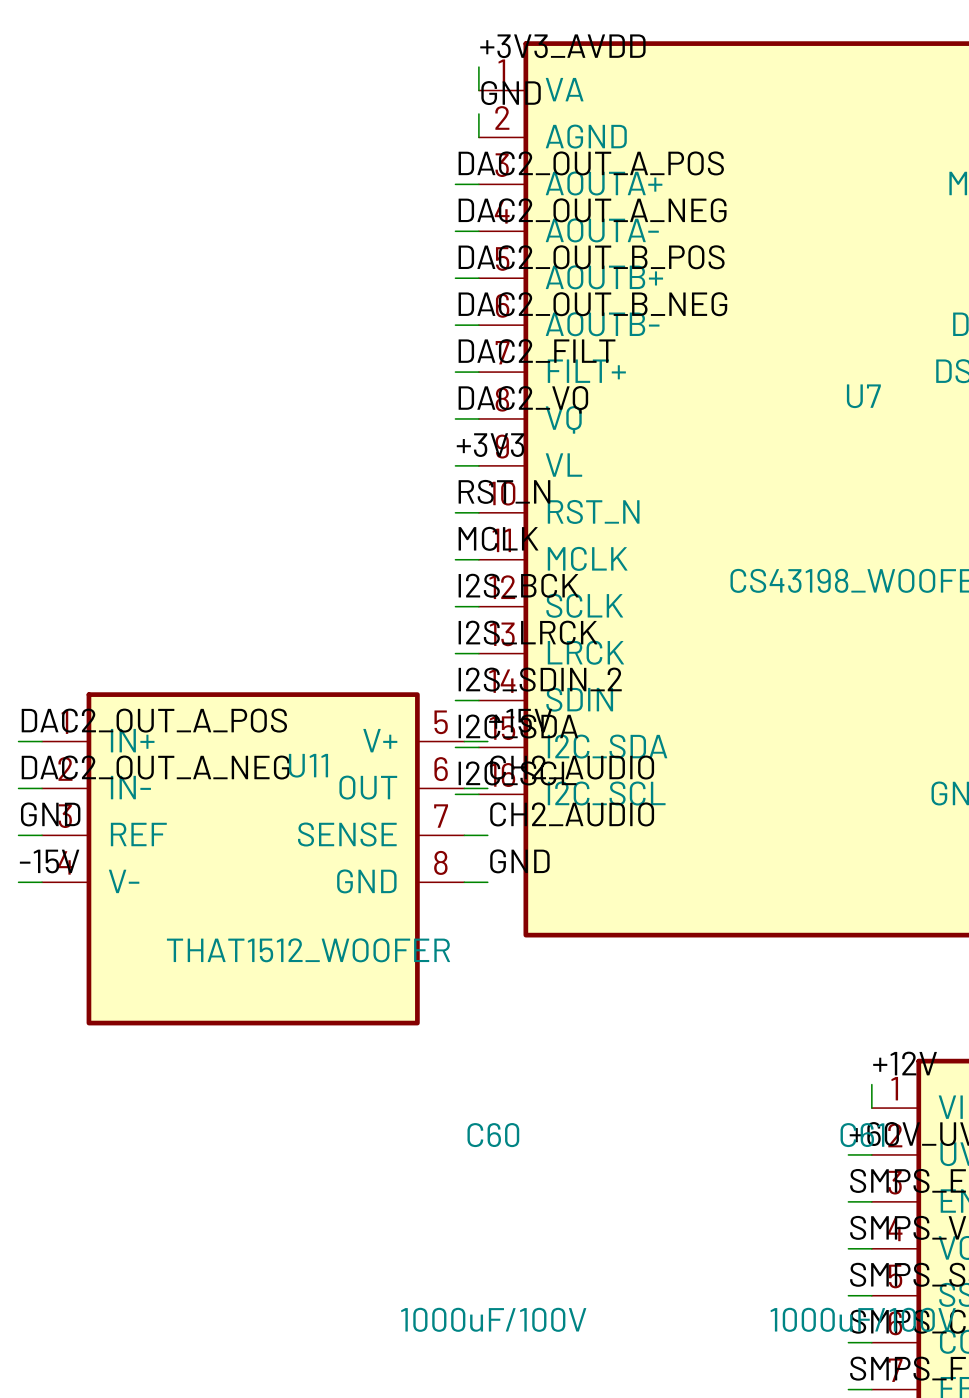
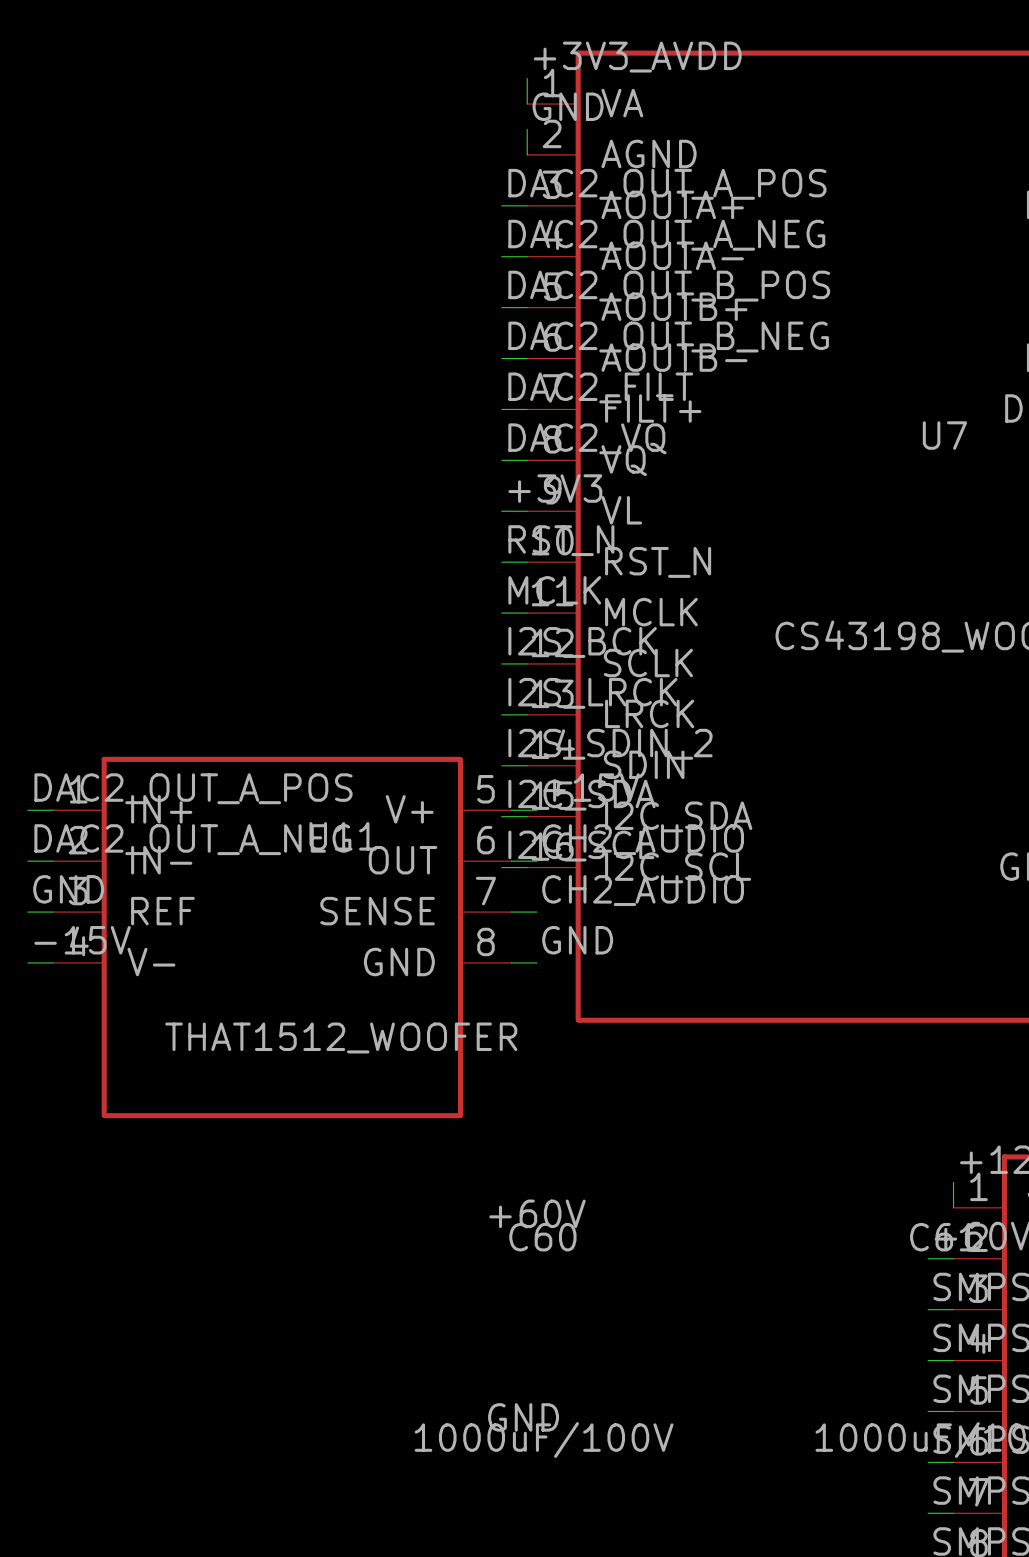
label: none -> +60V (537, 1213)
label: none -> GND (523, 1417)

